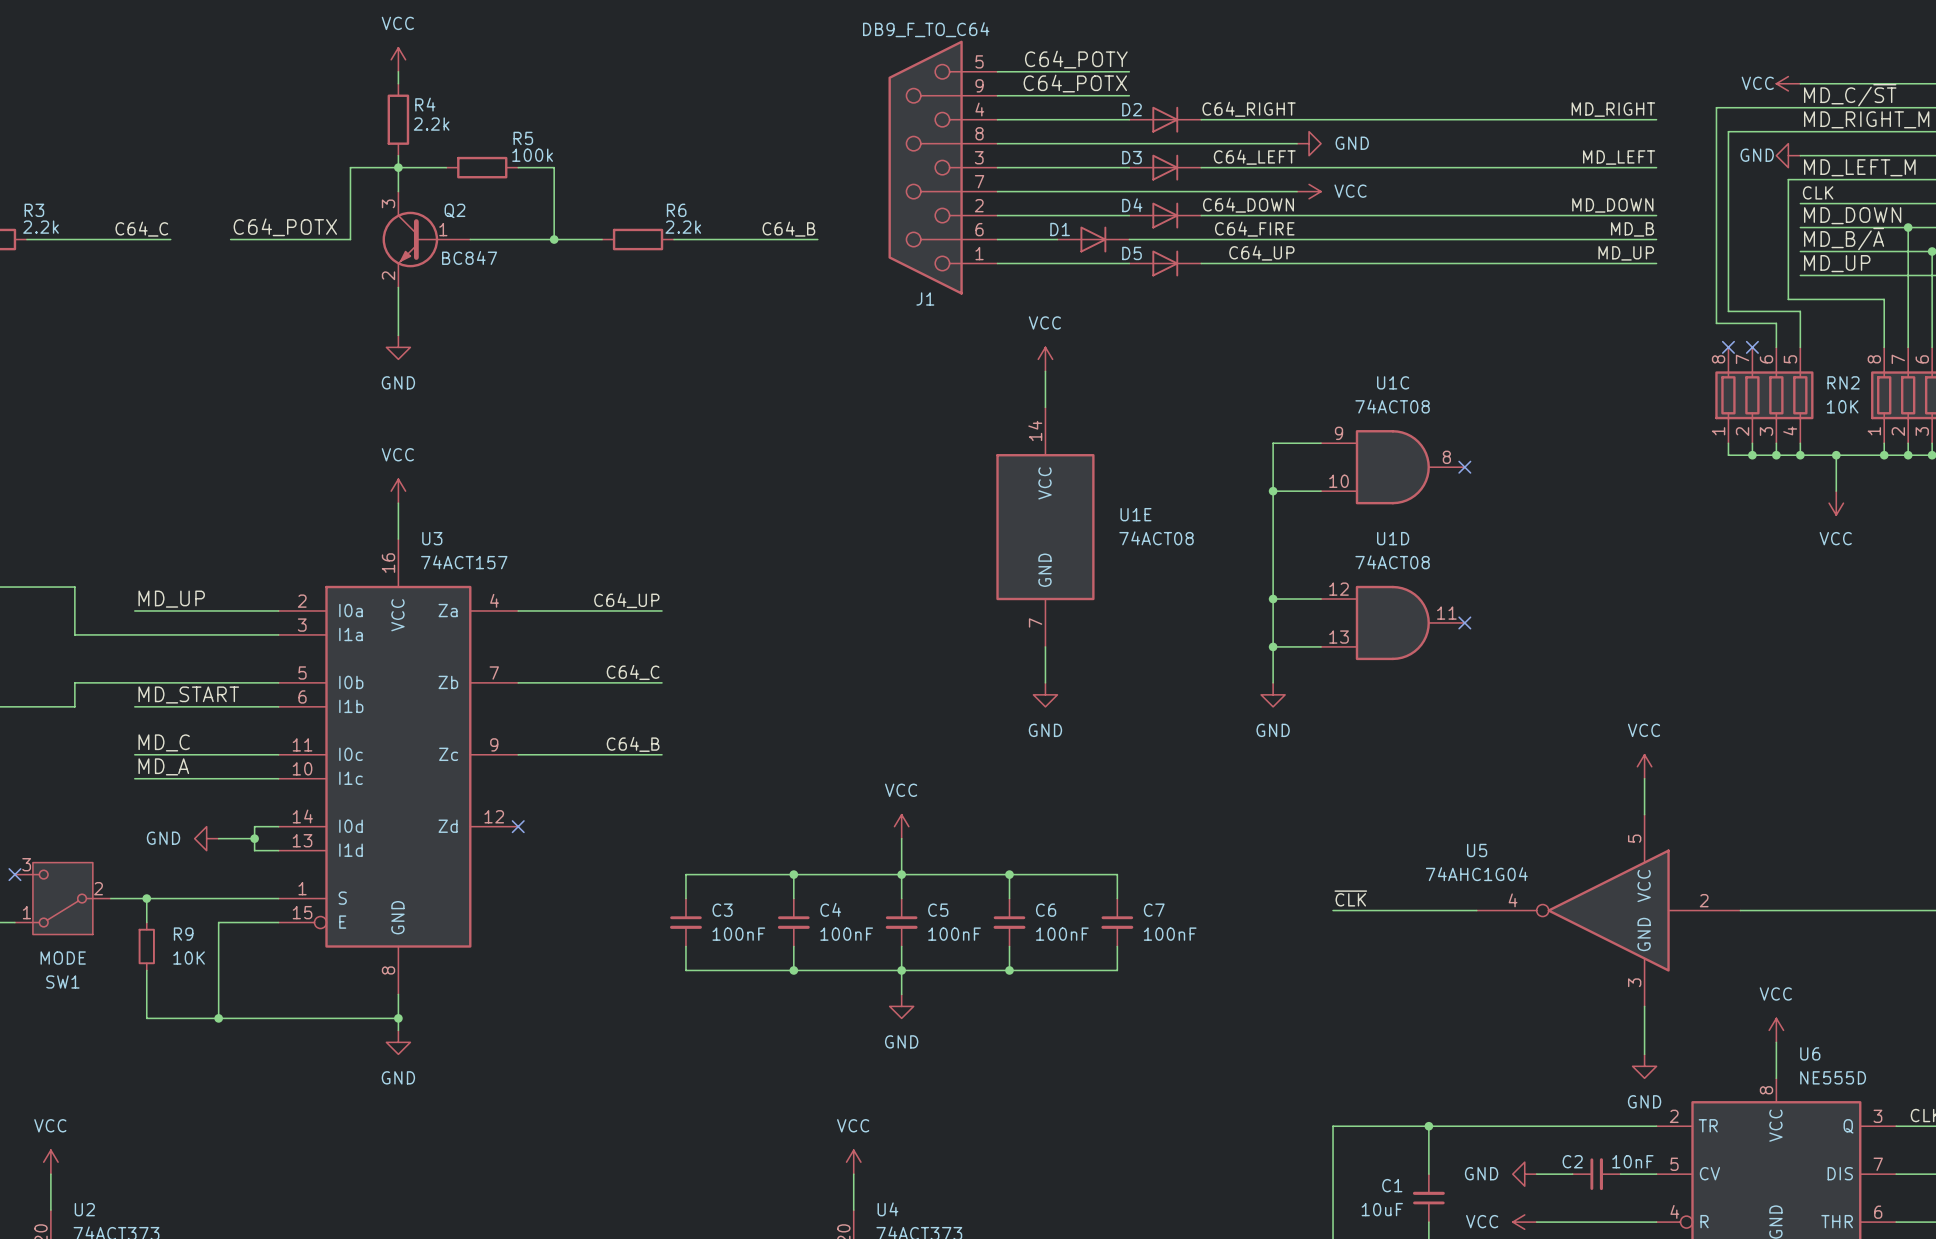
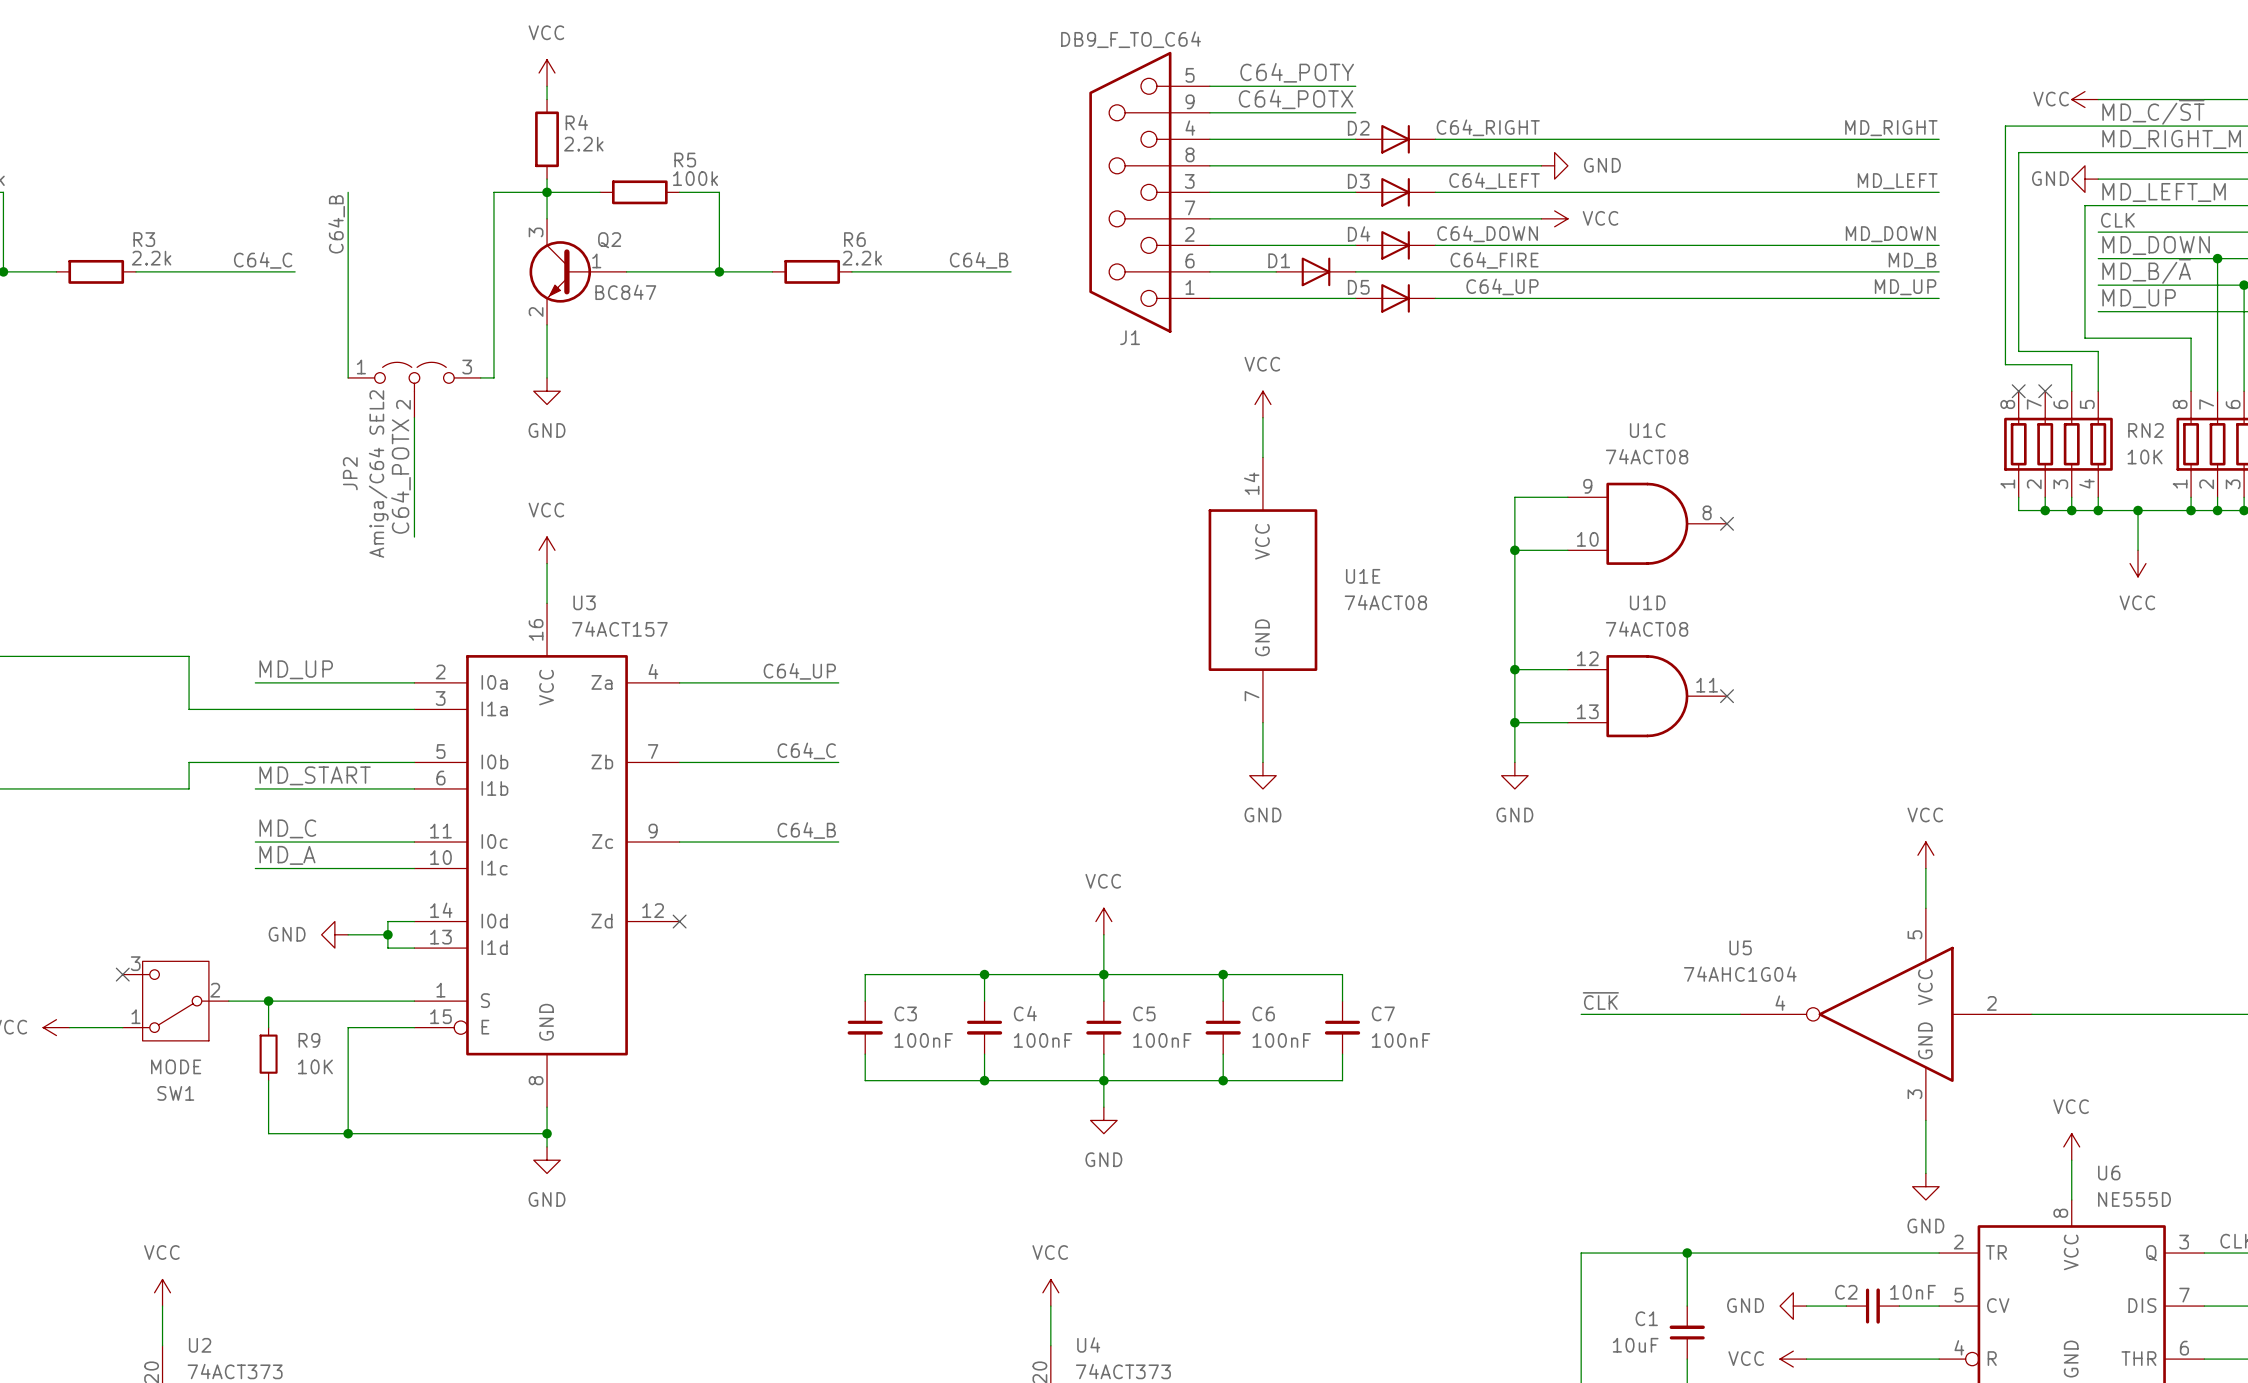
wire: none -> (348, 192) (348, 377)
label: none -> C64_B (336, 224)
label: C64_POTX (285, 227) -> none
wire: (230, 239) (350, 239) -> (480, 377) (493, 377) (493, 271)
JP2: none -> Amiga/C64 SEL2 (414, 390)
wire: none -> (414, 417) (414, 537)
label: none -> C64_POTX (400, 476)

